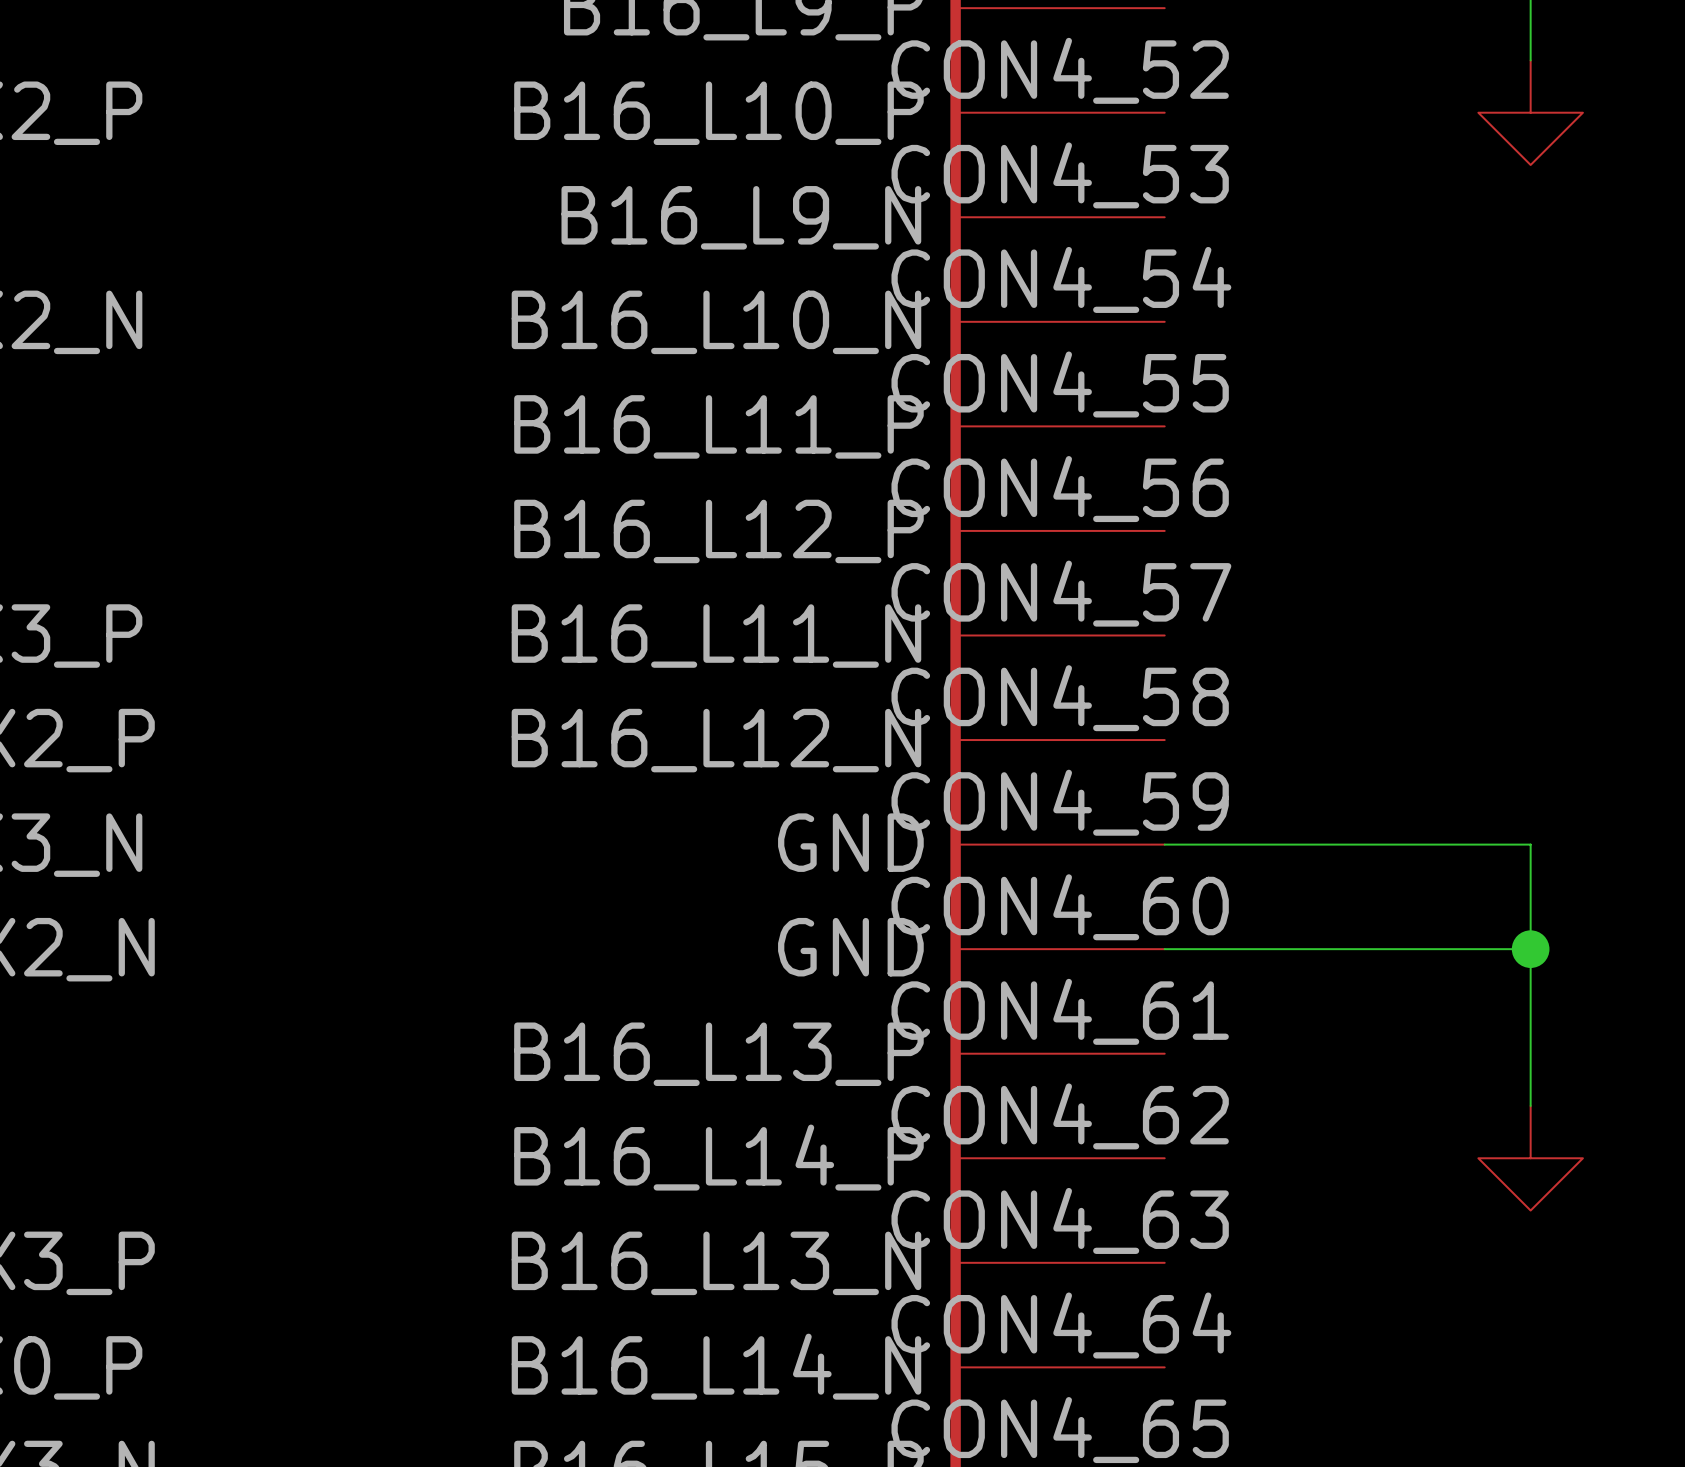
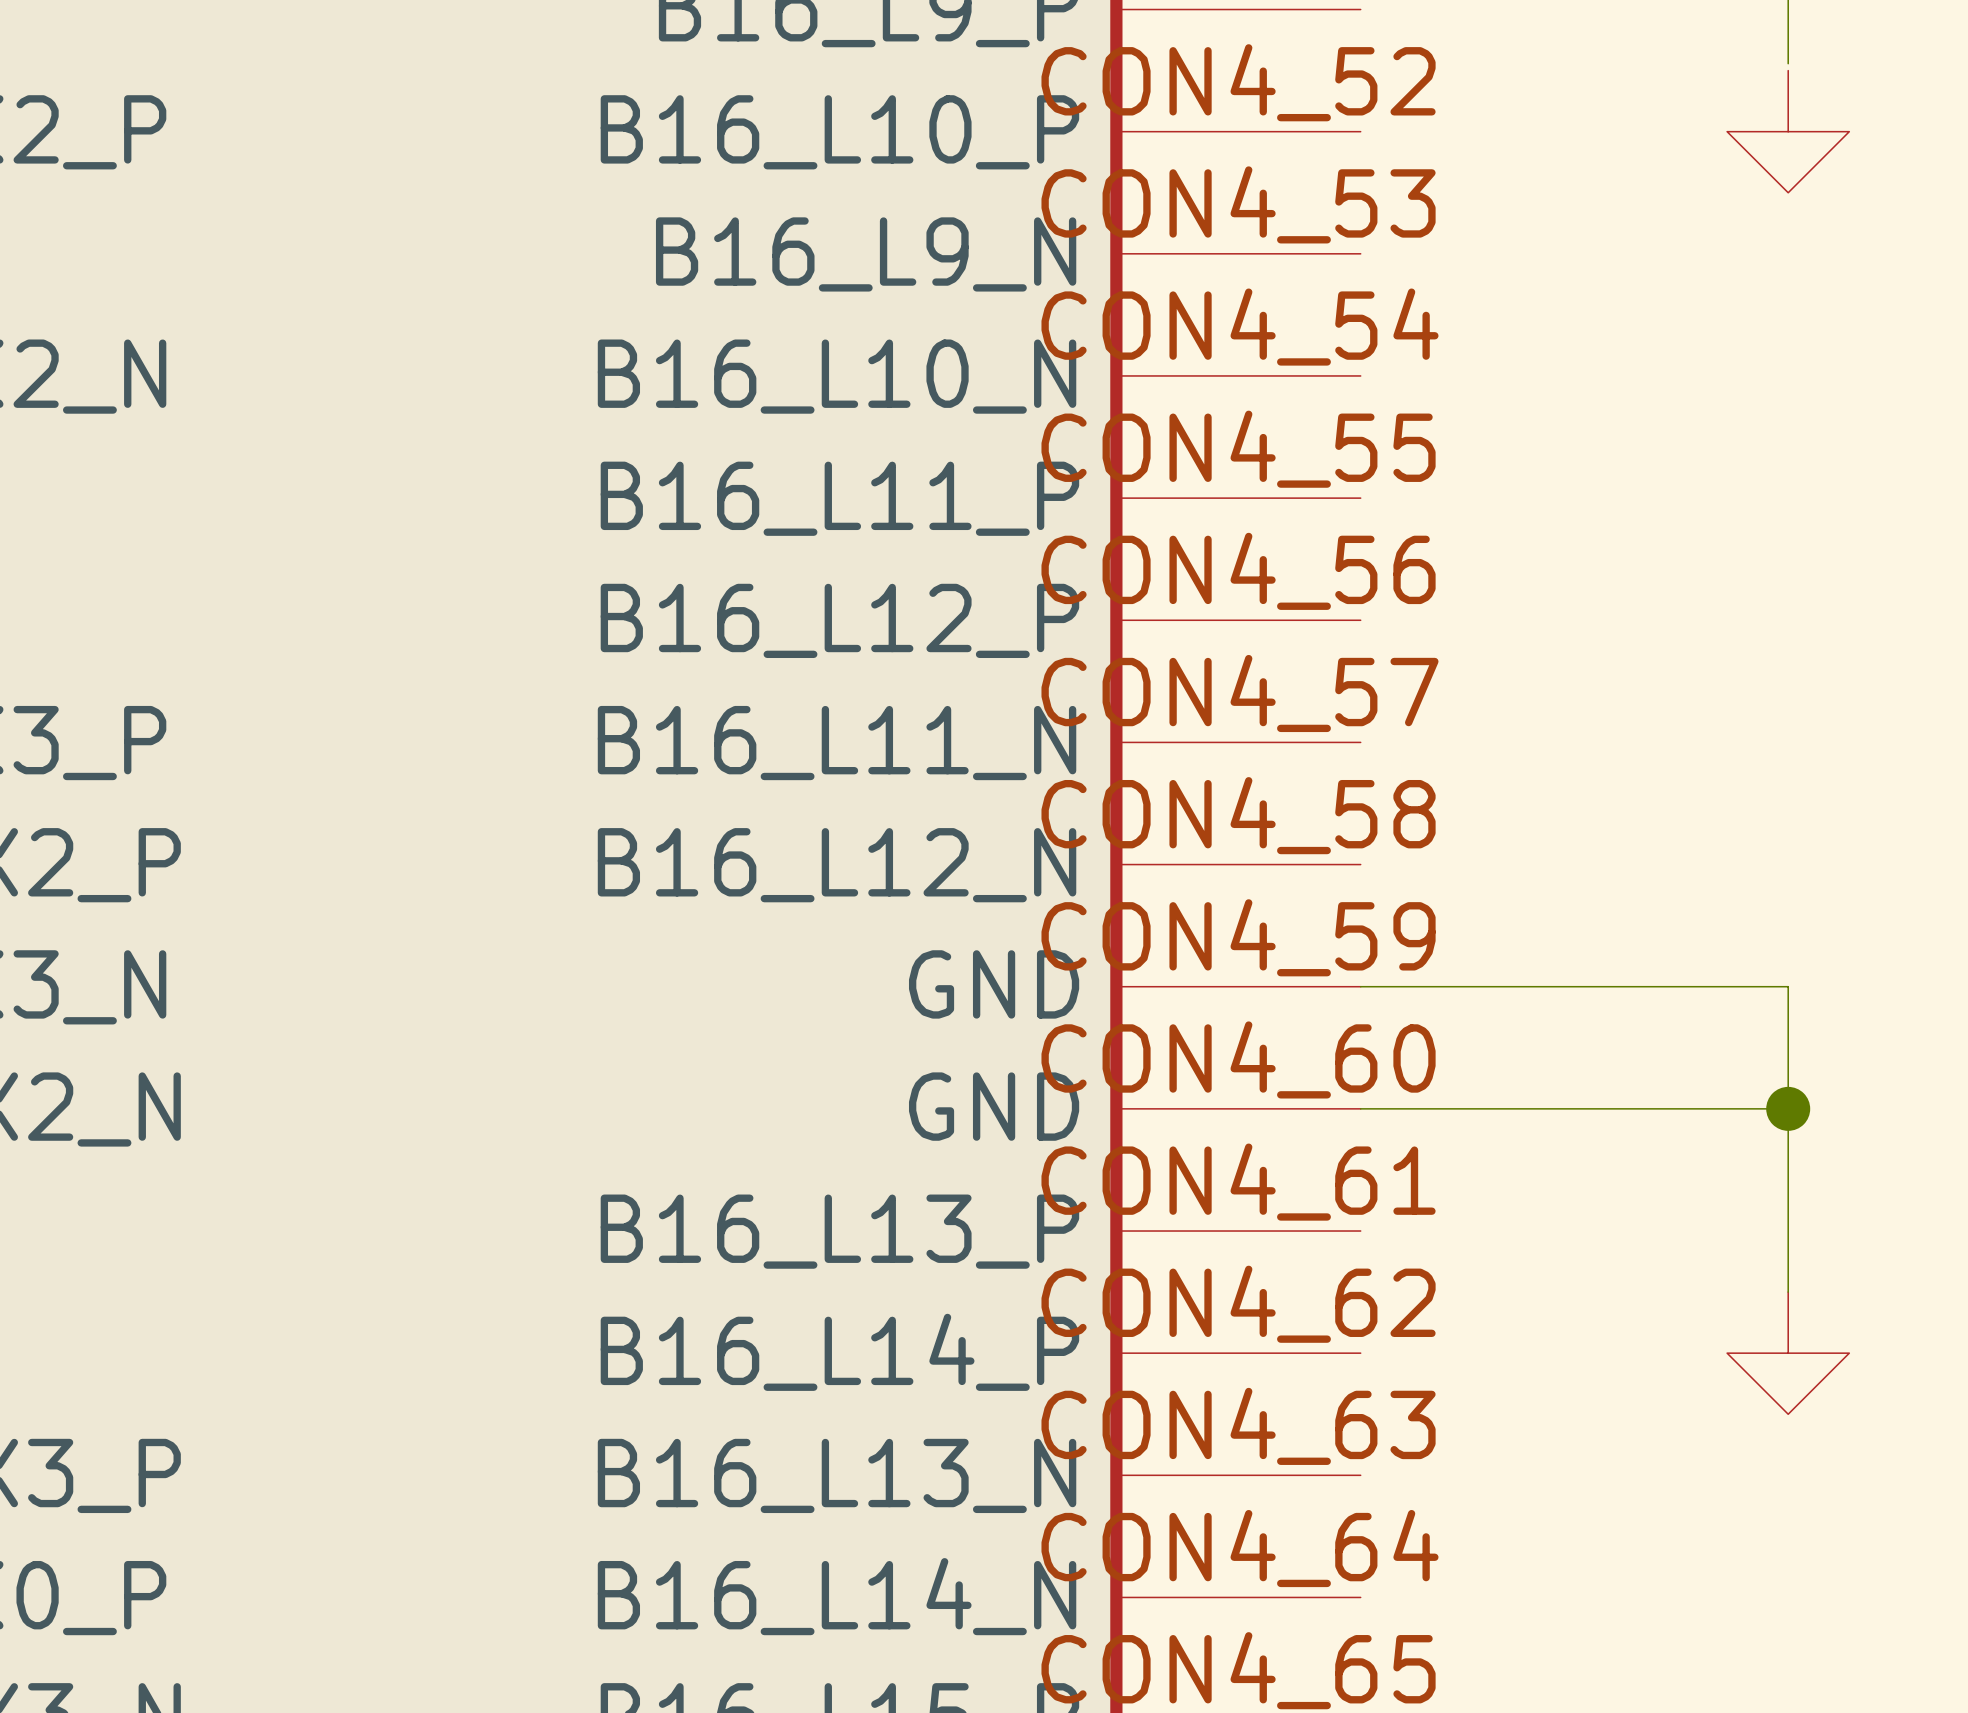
wire: (1530, 54) (1530, 60) -> none

